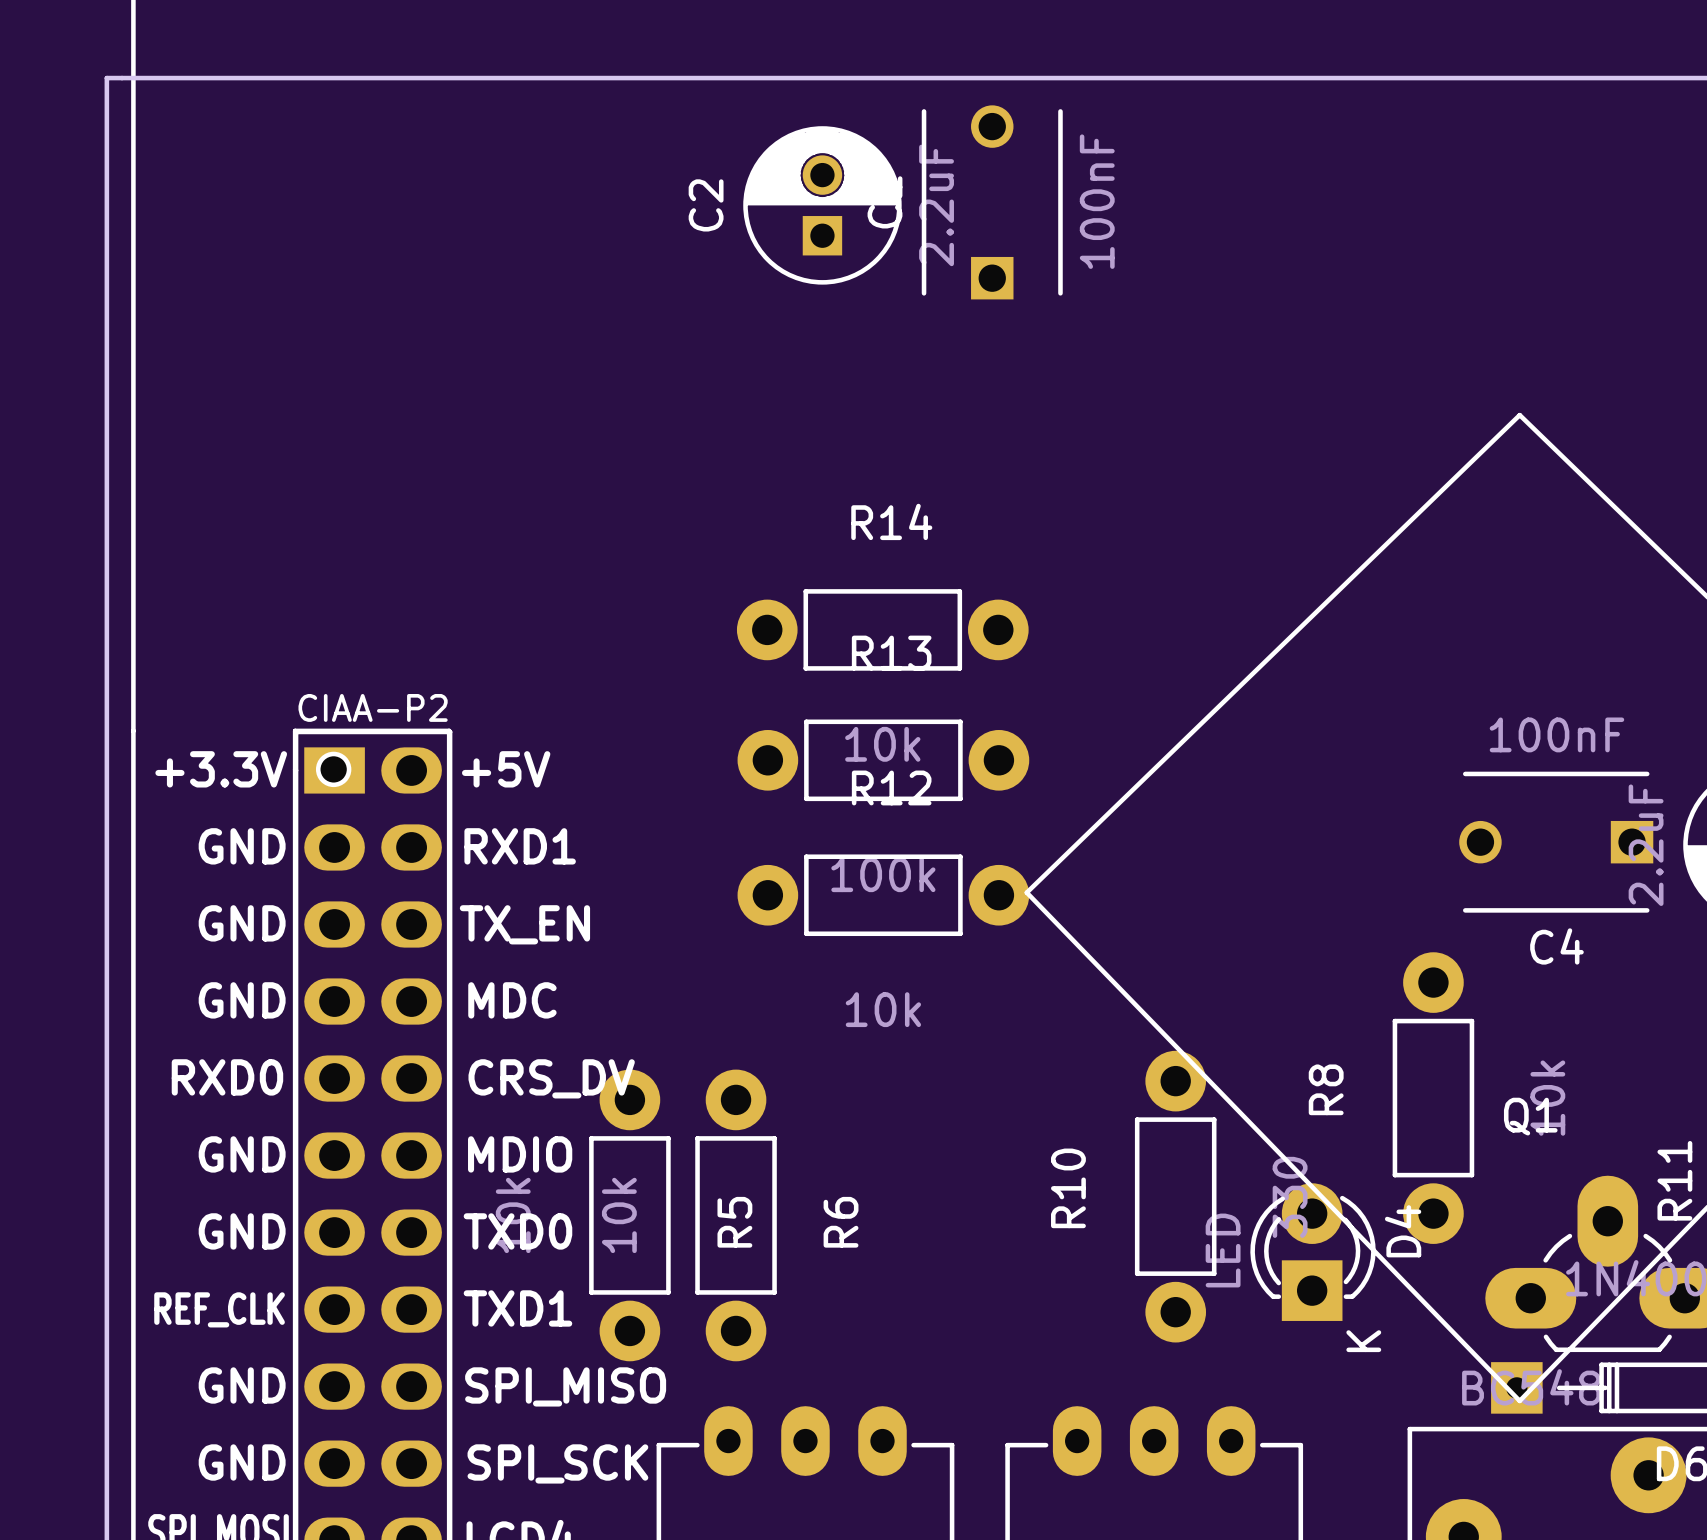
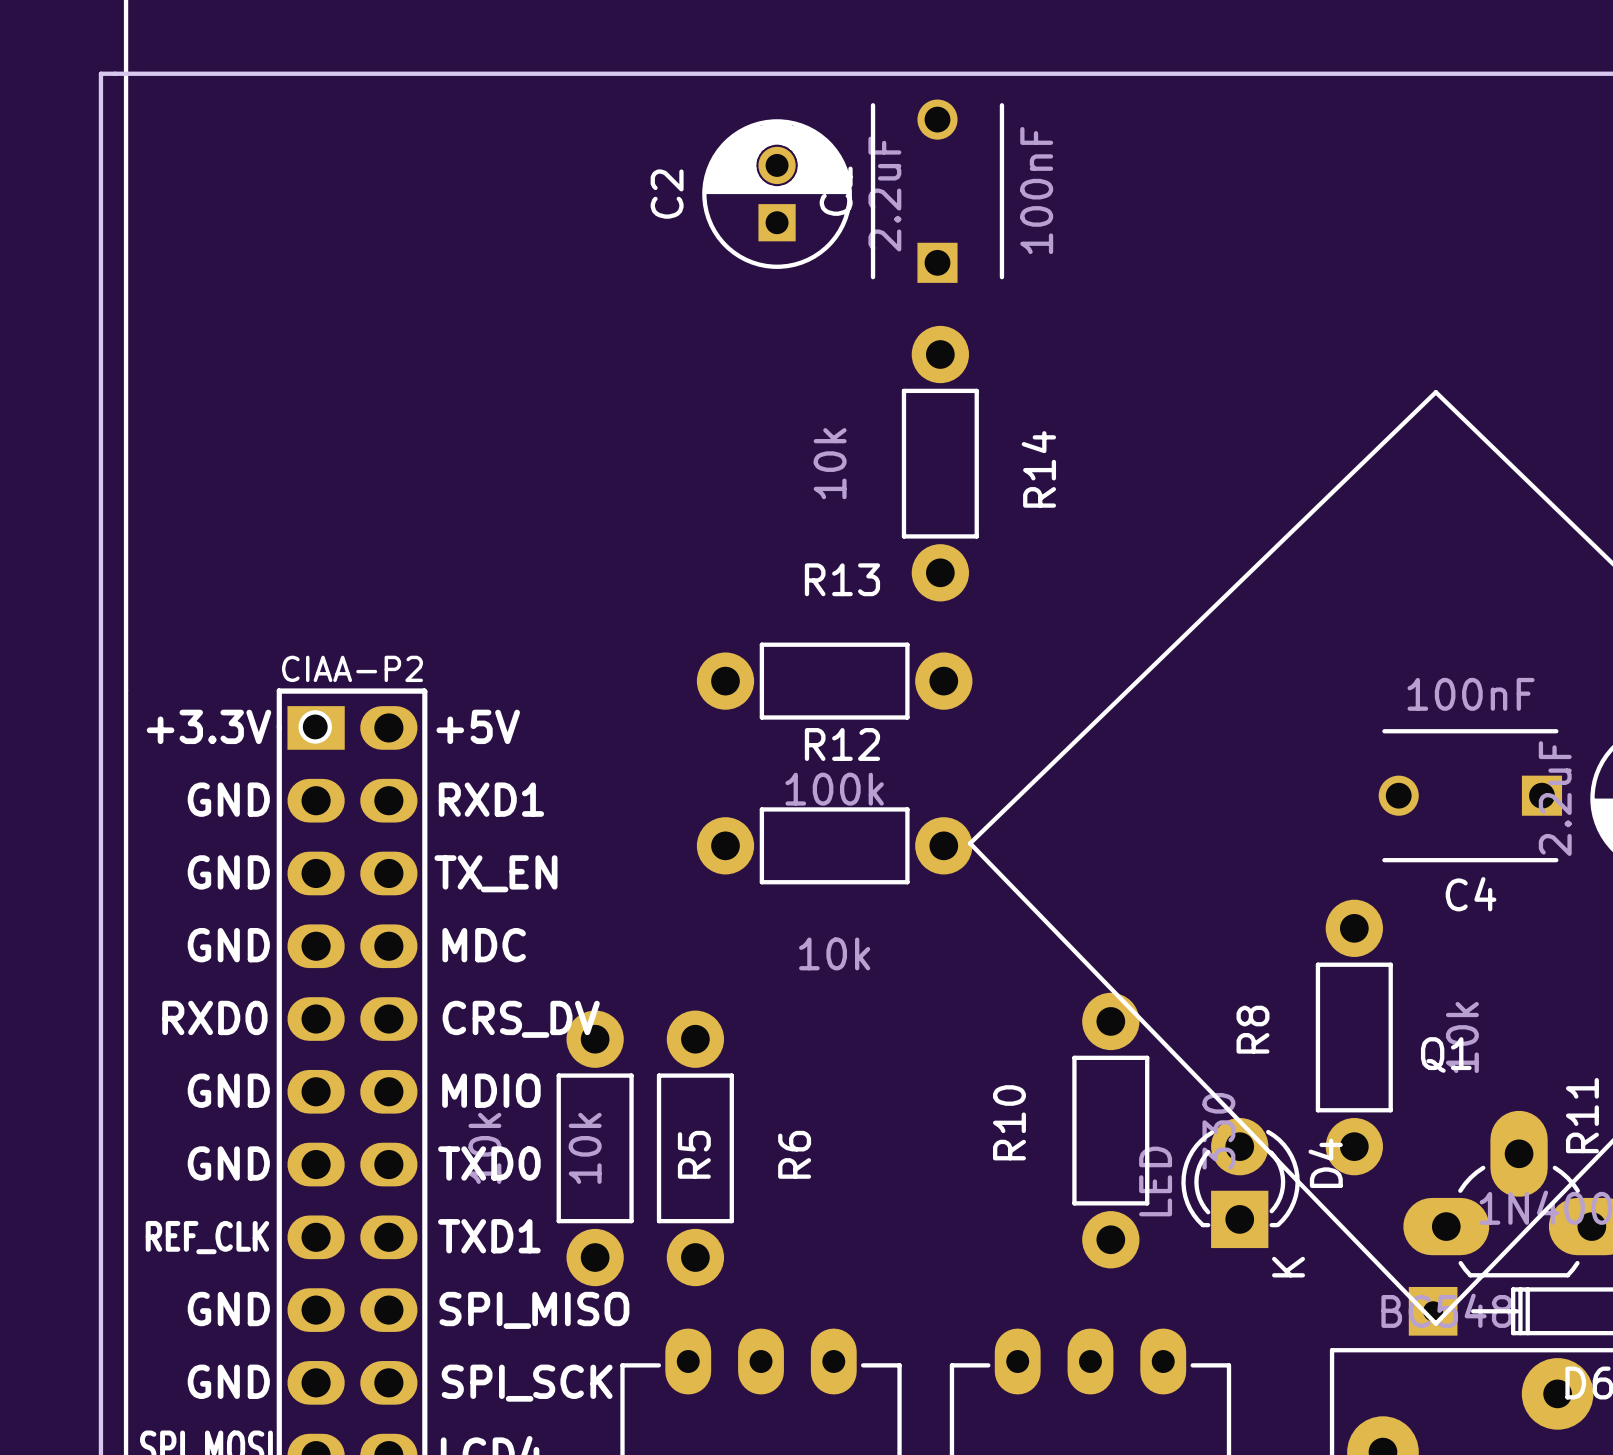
R14 rotation: 0° (882, 629) -> 90° clockwise (940, 463)
R14 position: (882, 629) -> (940, 463)
R13 position: (883, 760) -> (834, 681)

